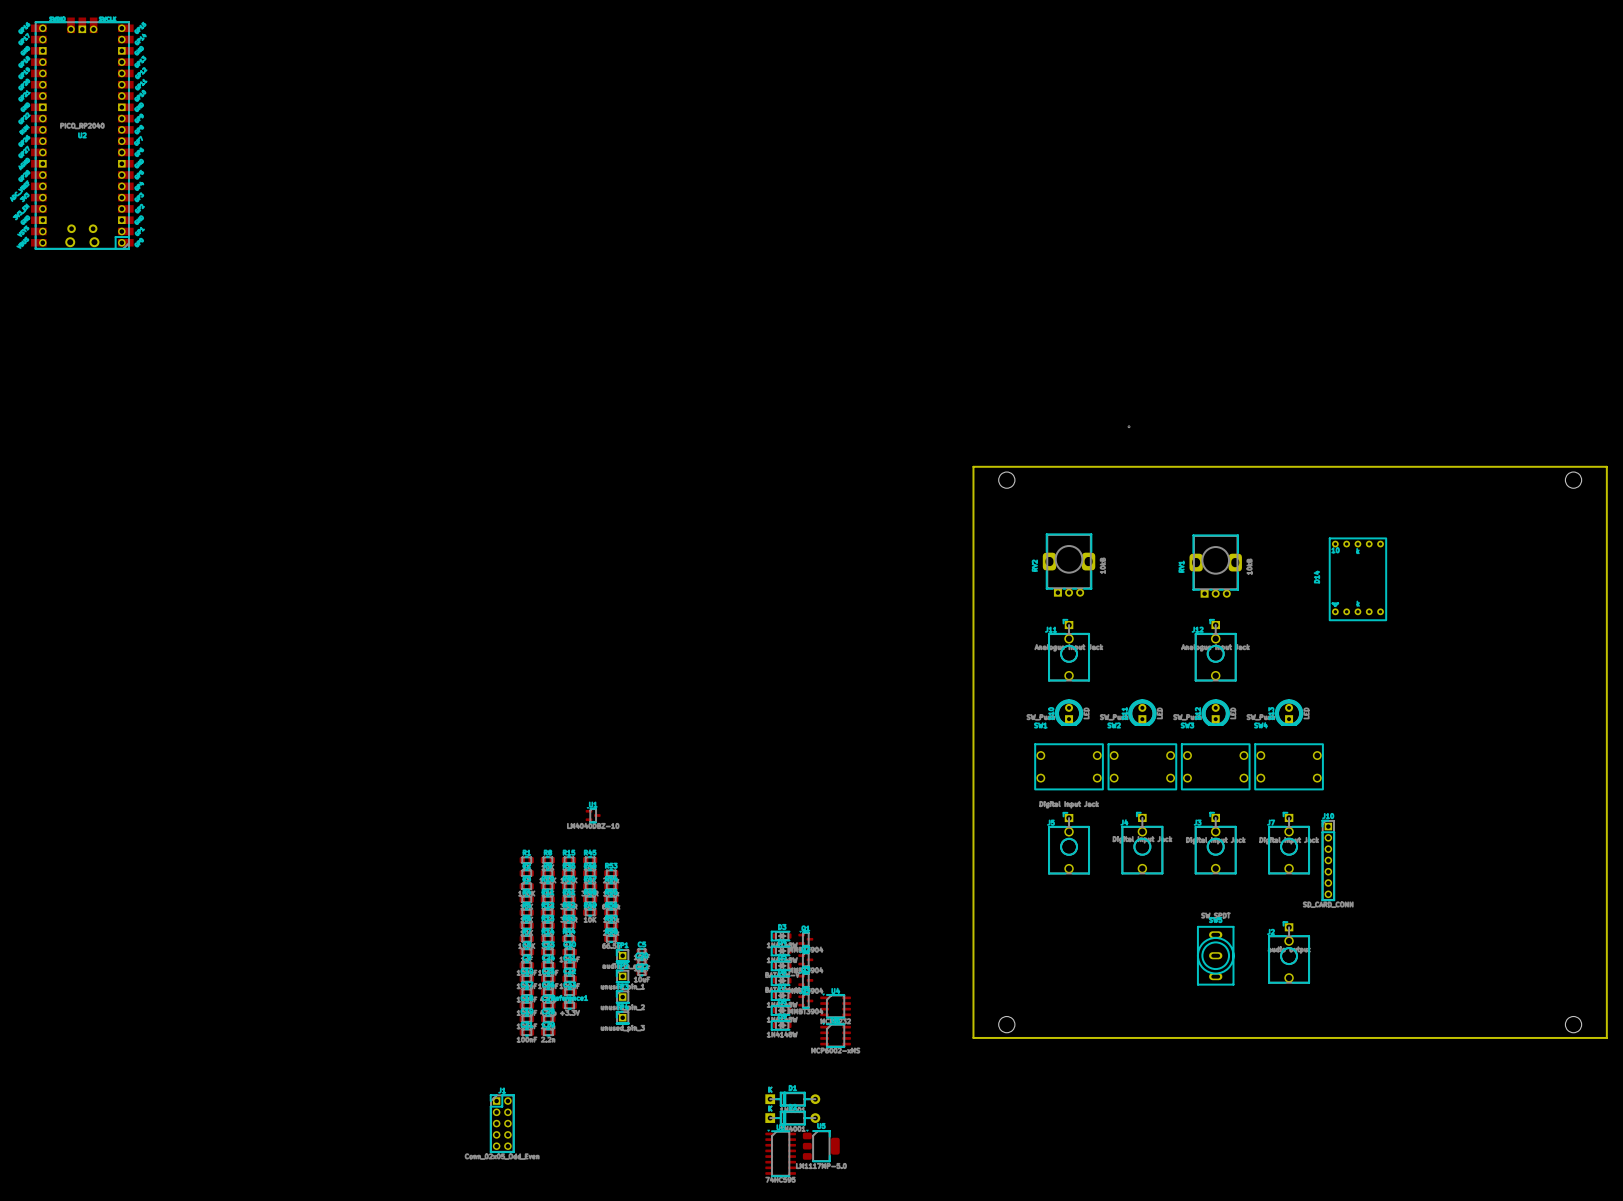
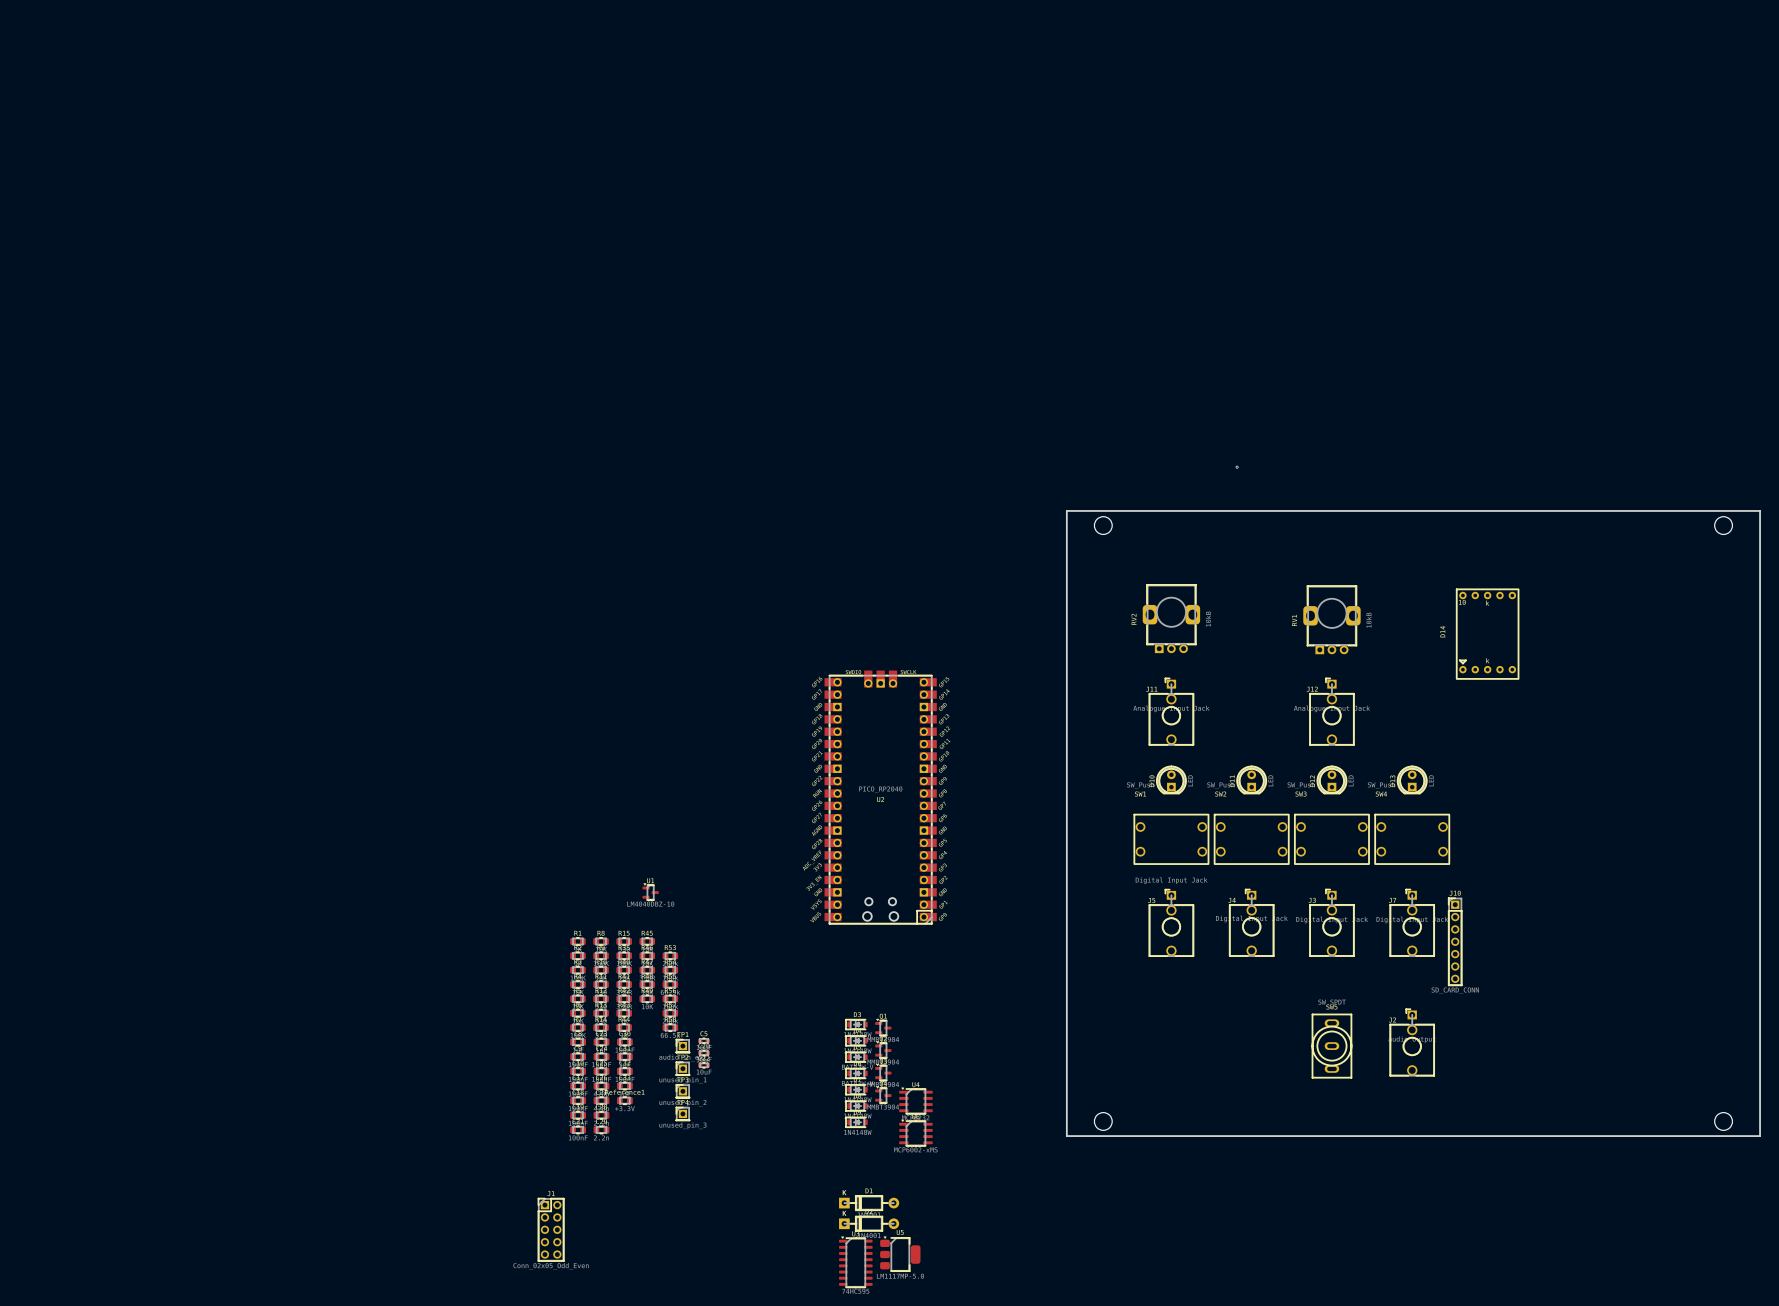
part position: (82, 133) -> (880, 797)

